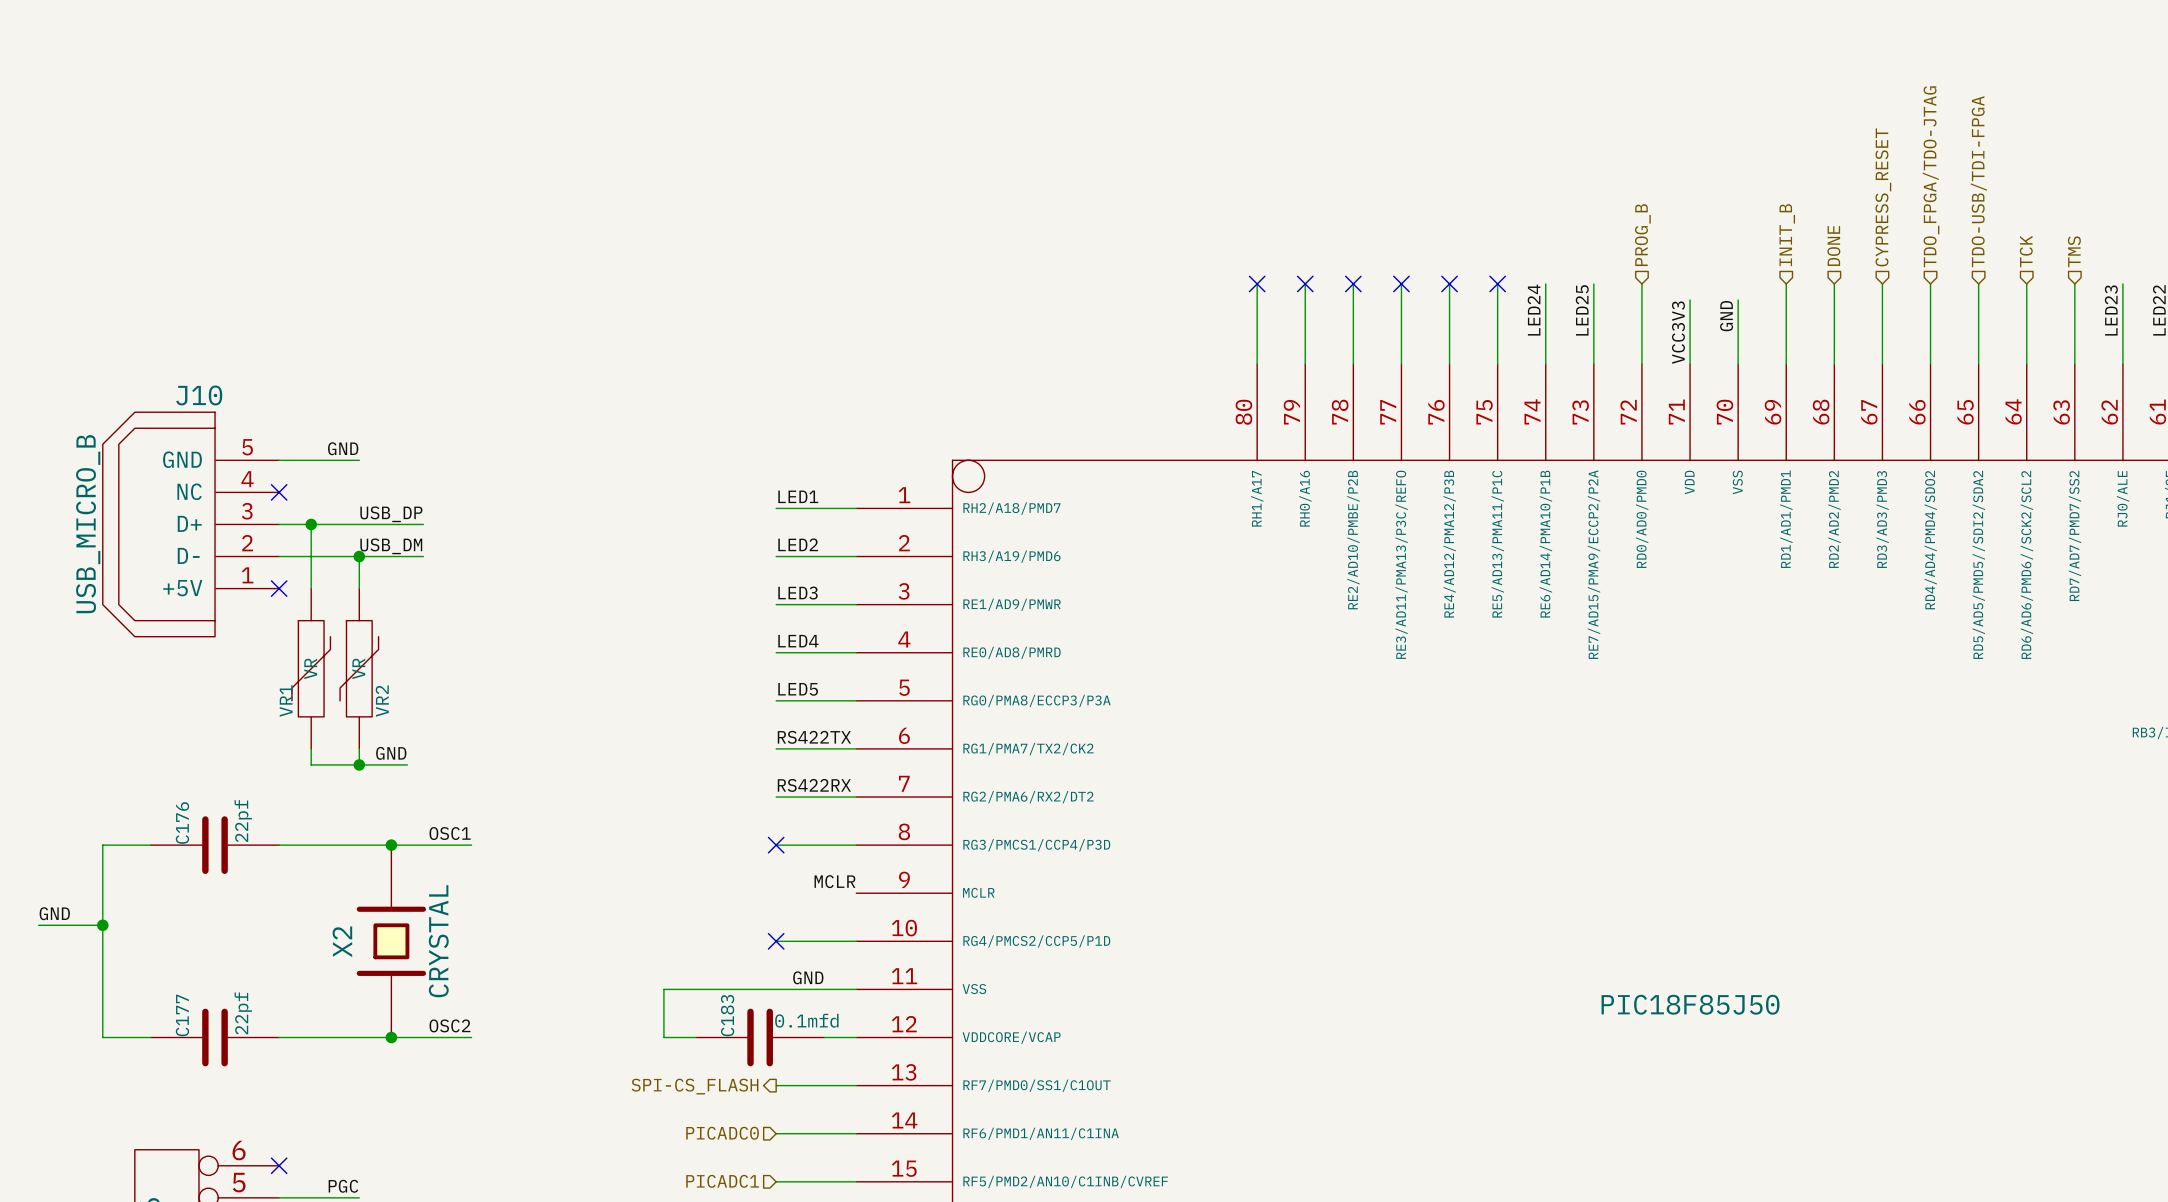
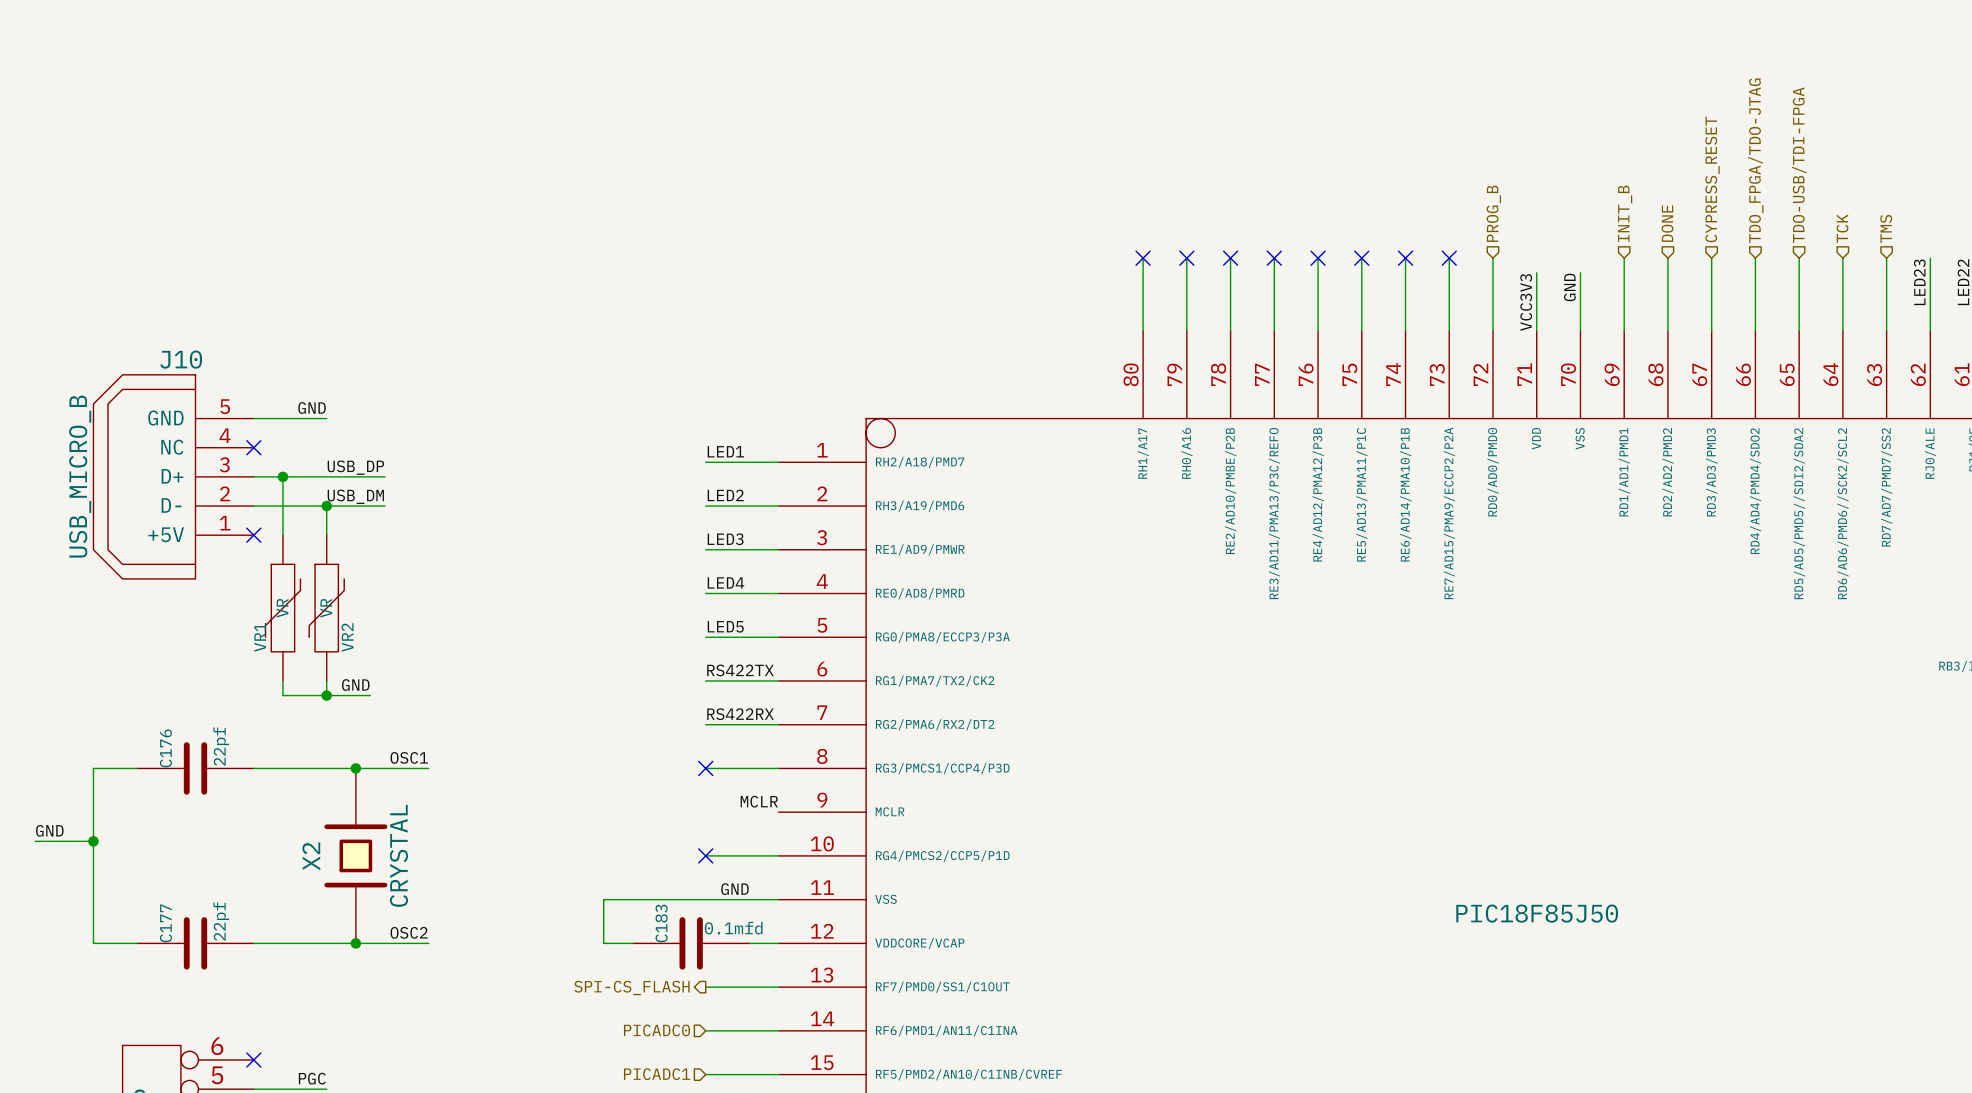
no-connect mark: none -> (1405, 258)
no-connect mark: none -> (1449, 258)
label: LED24 (1534, 310) -> none
label: LED25 (1582, 310) -> none

